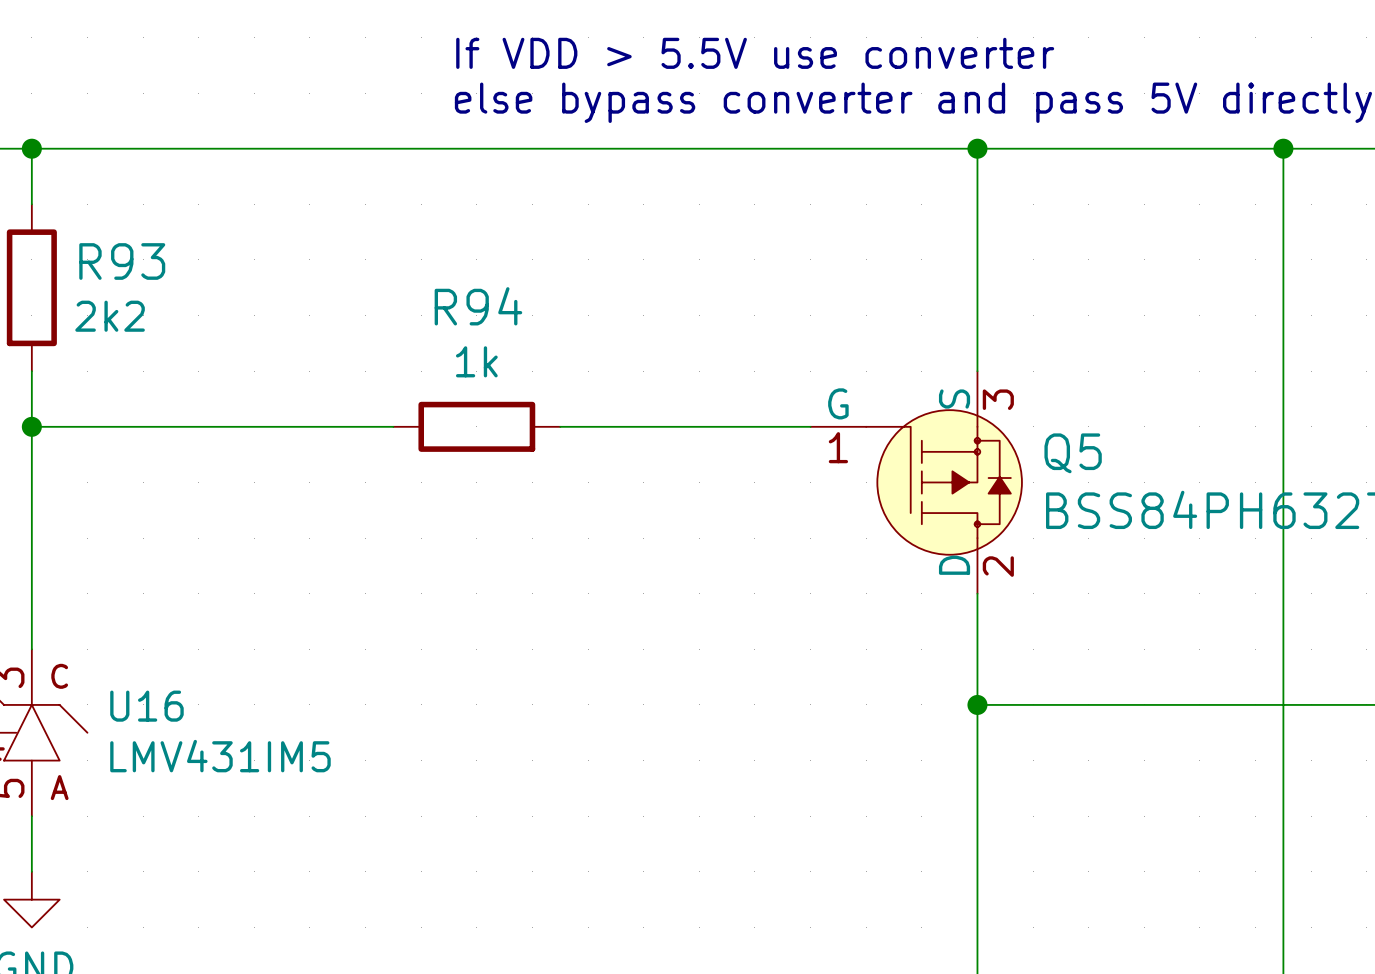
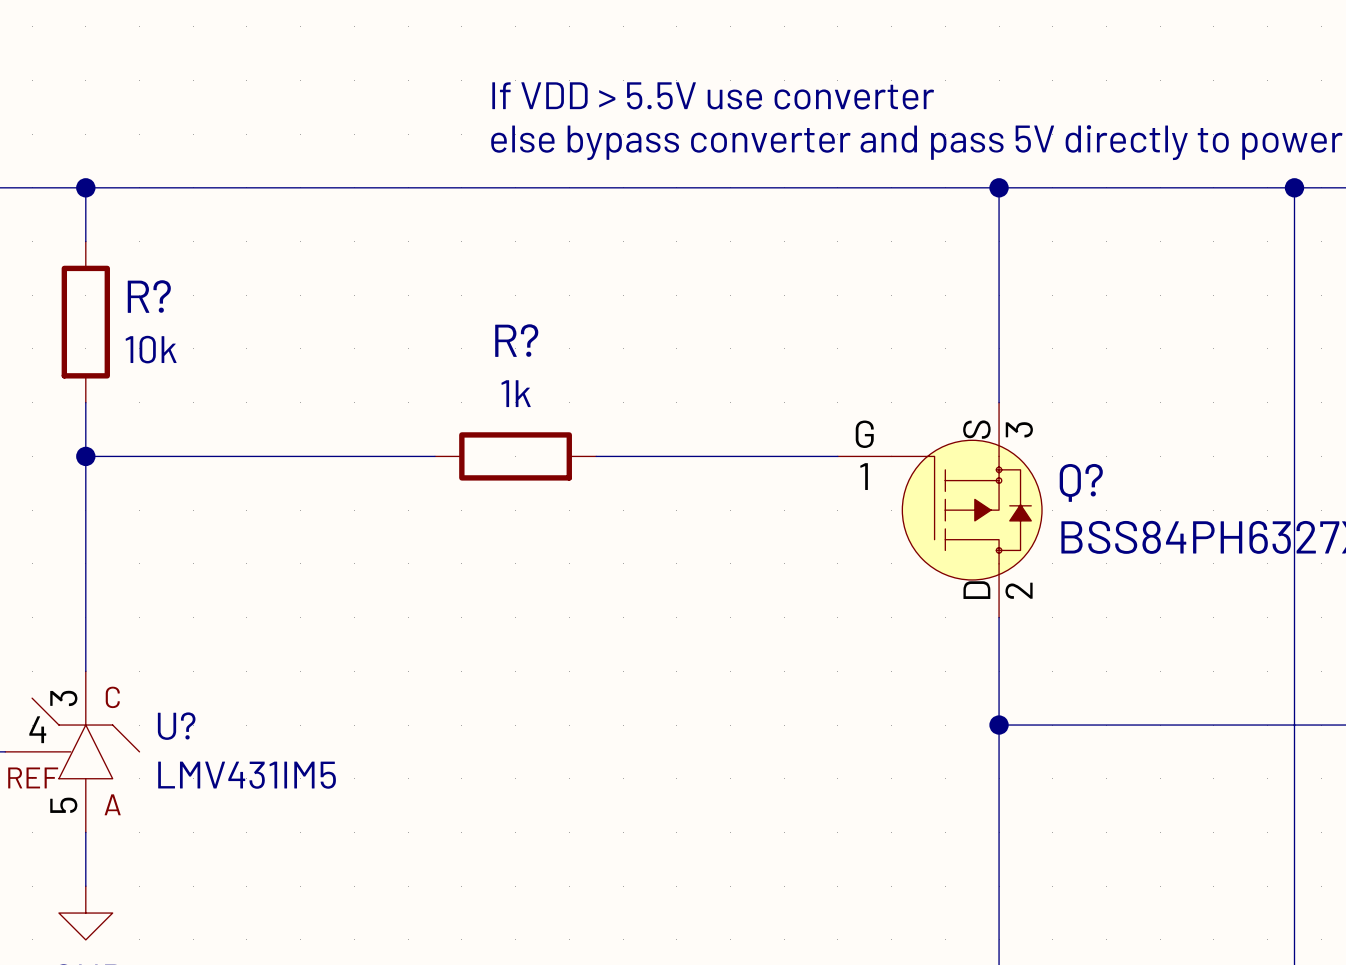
R93 name: R93 (122, 261) -> R? (149, 296)
R94 name: R94 (478, 306) -> R? (516, 340)
R93 text: 2k2 (110, 316) -> 10k (151, 349)
Q5 name: Q5 (1073, 453) -> Q? (1081, 482)
U16 name: U16 (146, 706) -> U? (176, 726)

